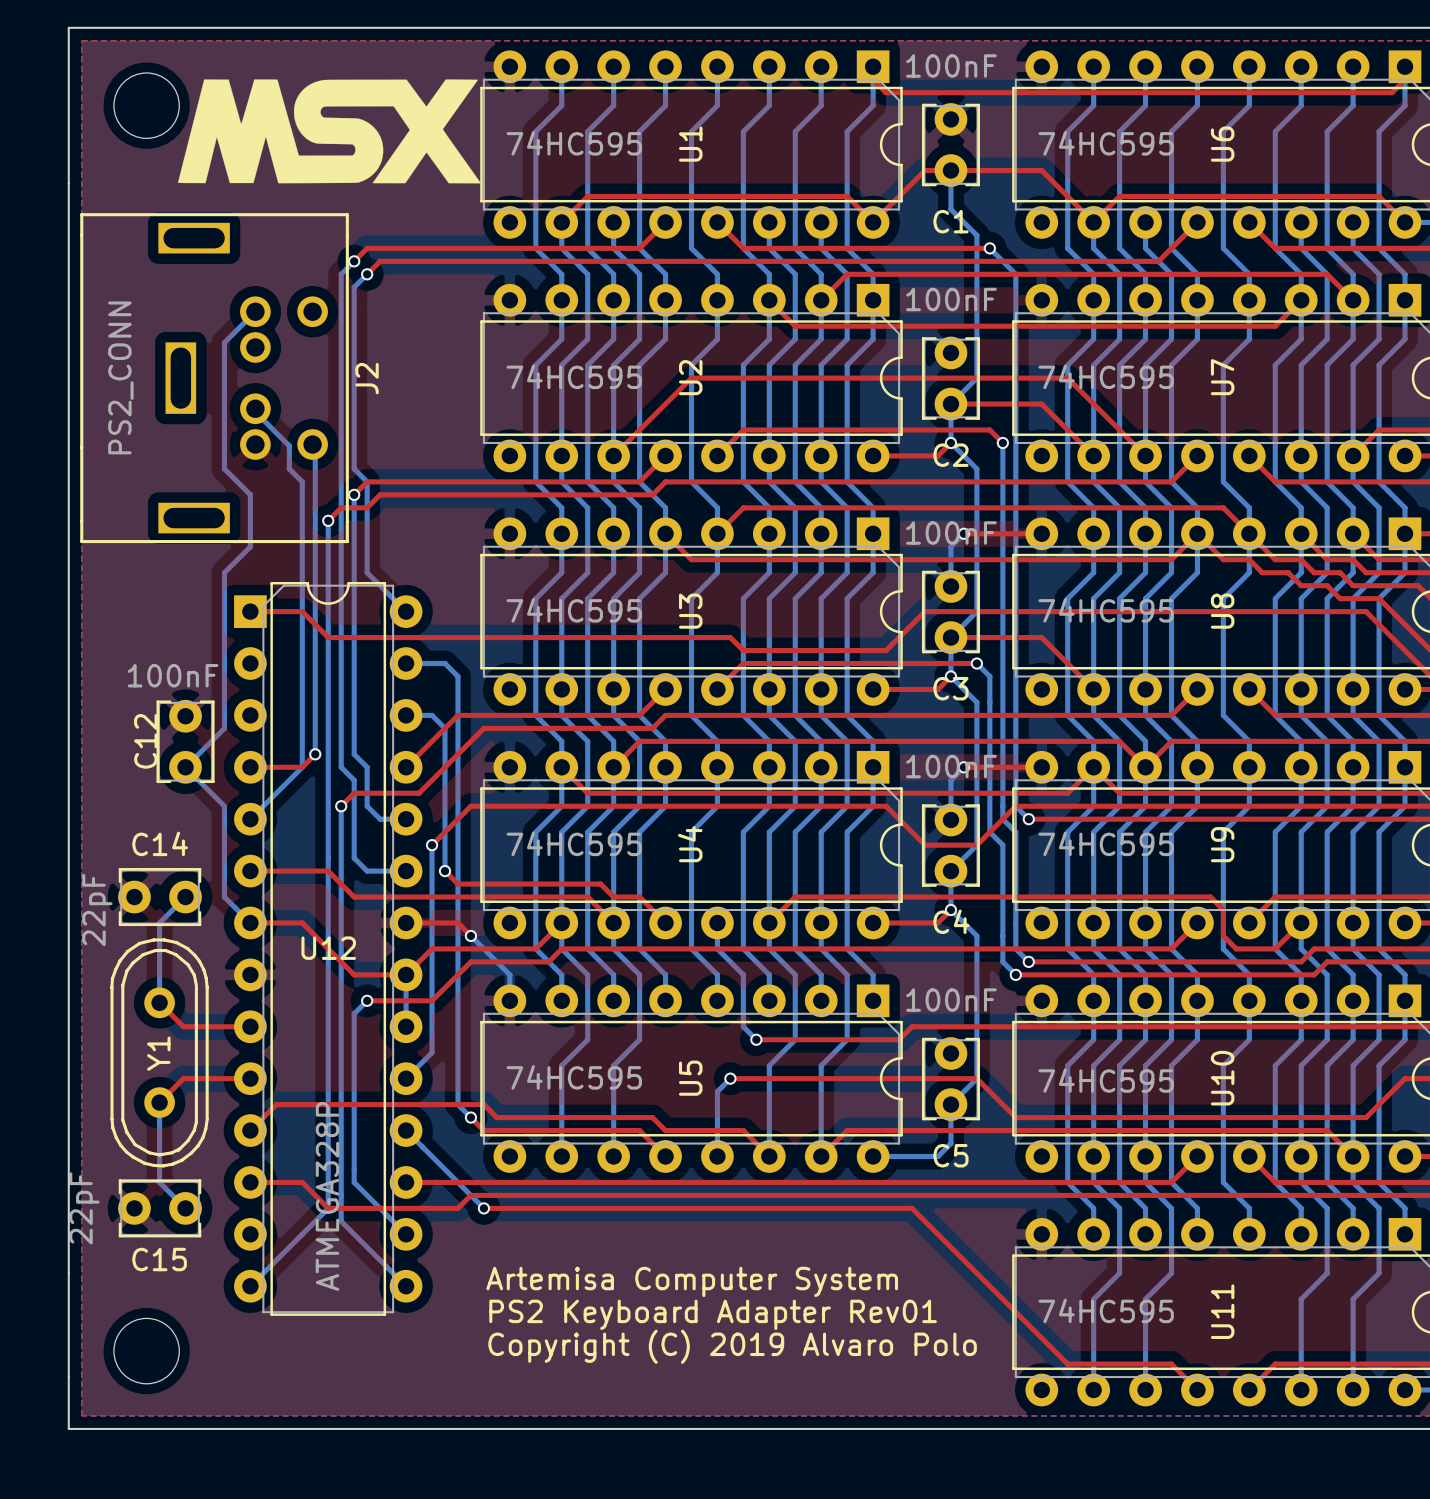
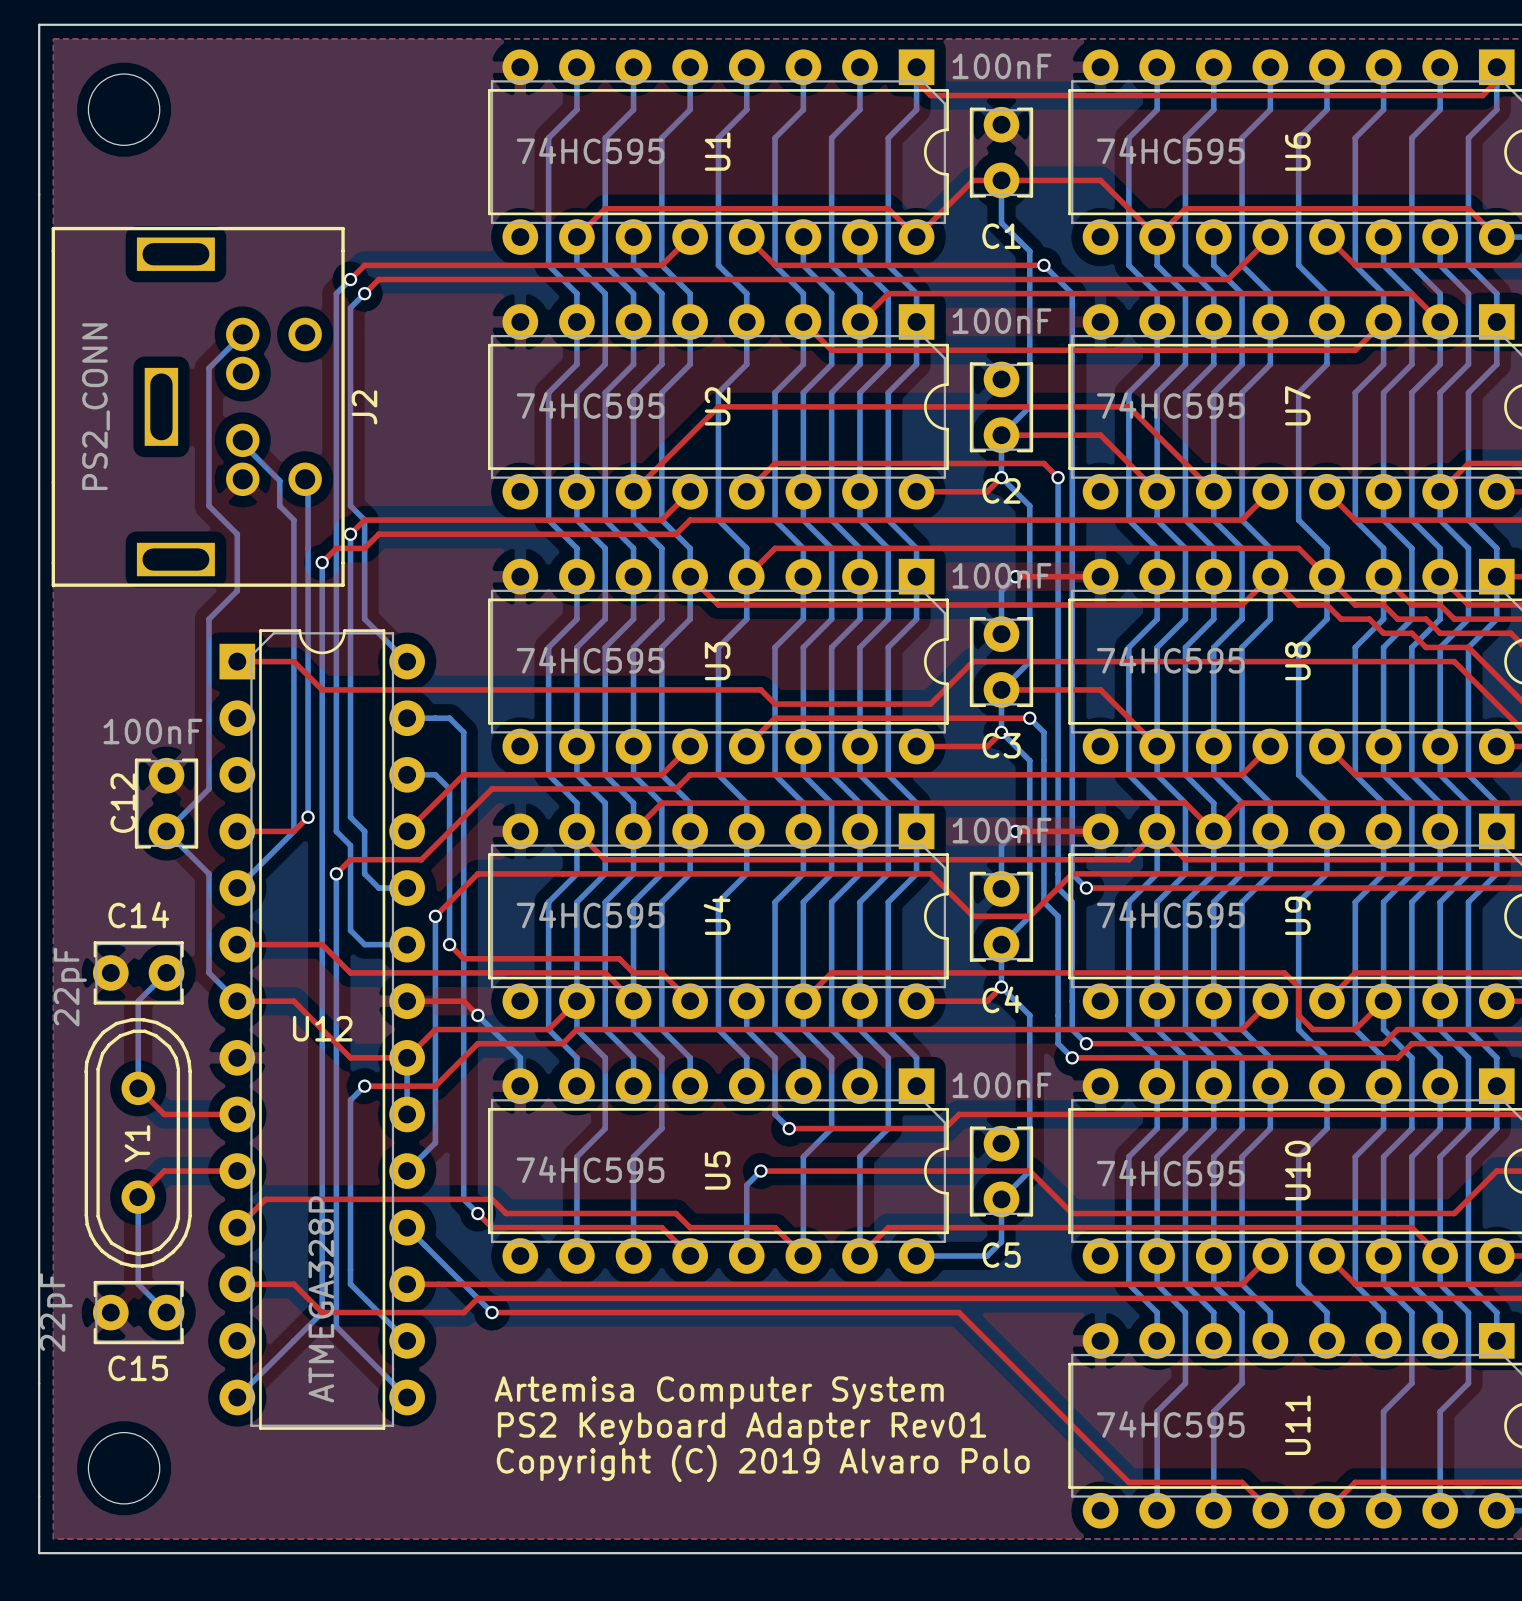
drawing: [177, 79, 481, 184] -> none

